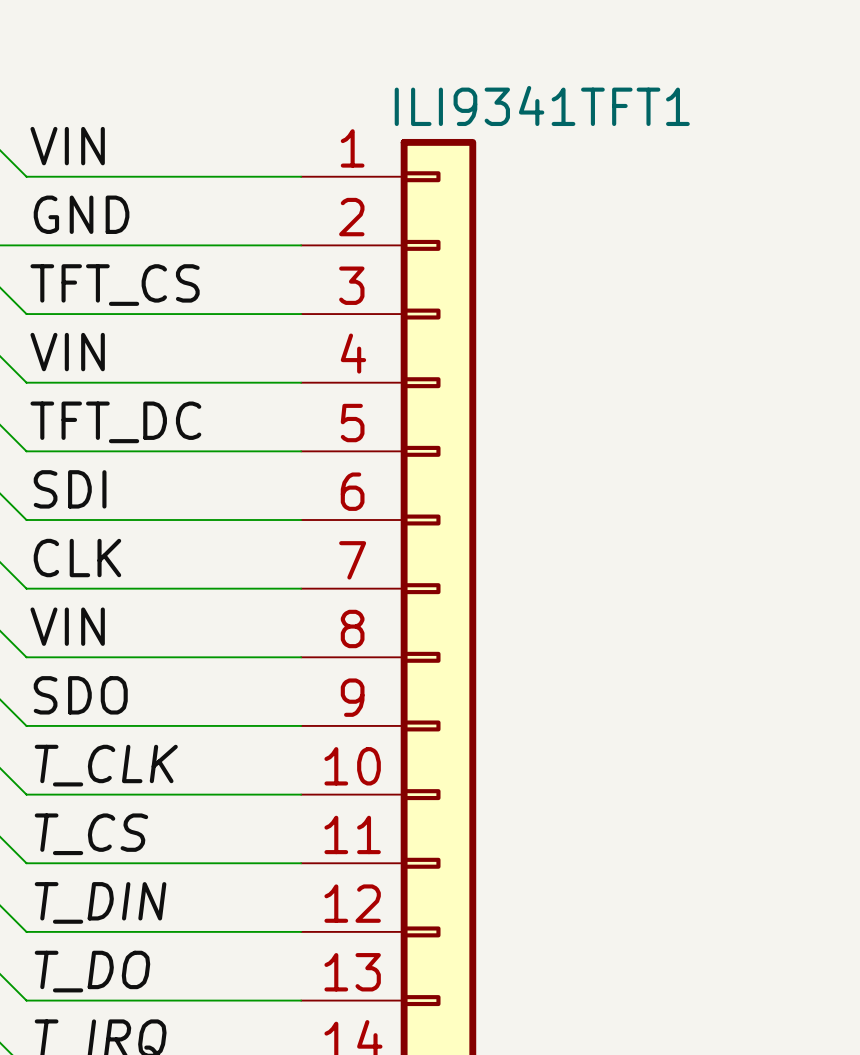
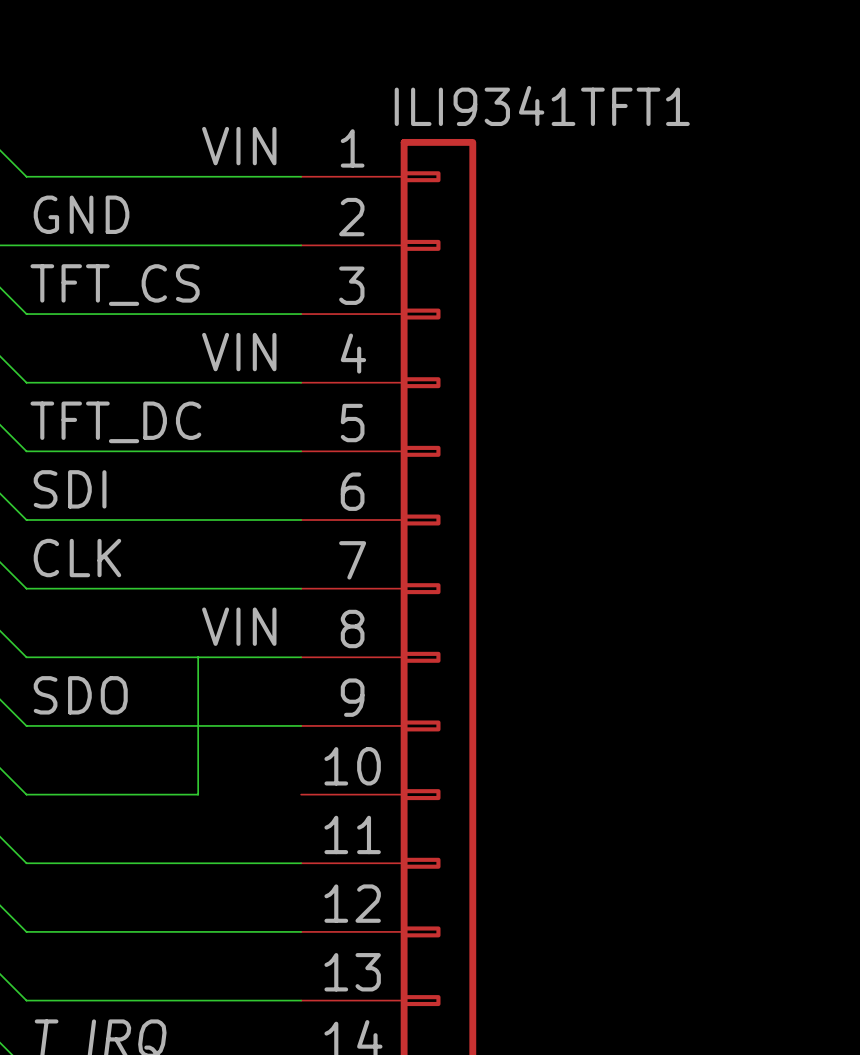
label: VIN (67, 146) -> none
label: none -> VIN (239, 146)
label: VIN (67, 352) -> none
label: none -> VIN (239, 352)
label: VIN (67, 626) -> none
label: none -> VIN (239, 626)
label: T_CLK (106, 765) -> none
wire: (198, 794) (301, 794) -> (198, 794) (198, 657)
label: T_CS (91, 834) -> none
label: T_DIN (100, 902) -> none
label: T_DO (92, 971) -> none

